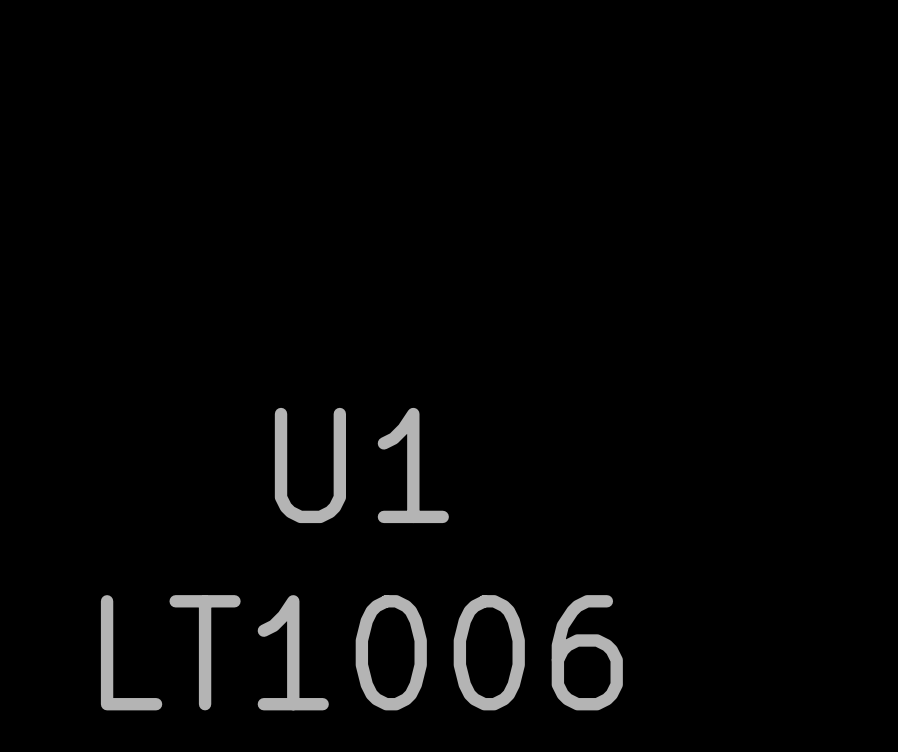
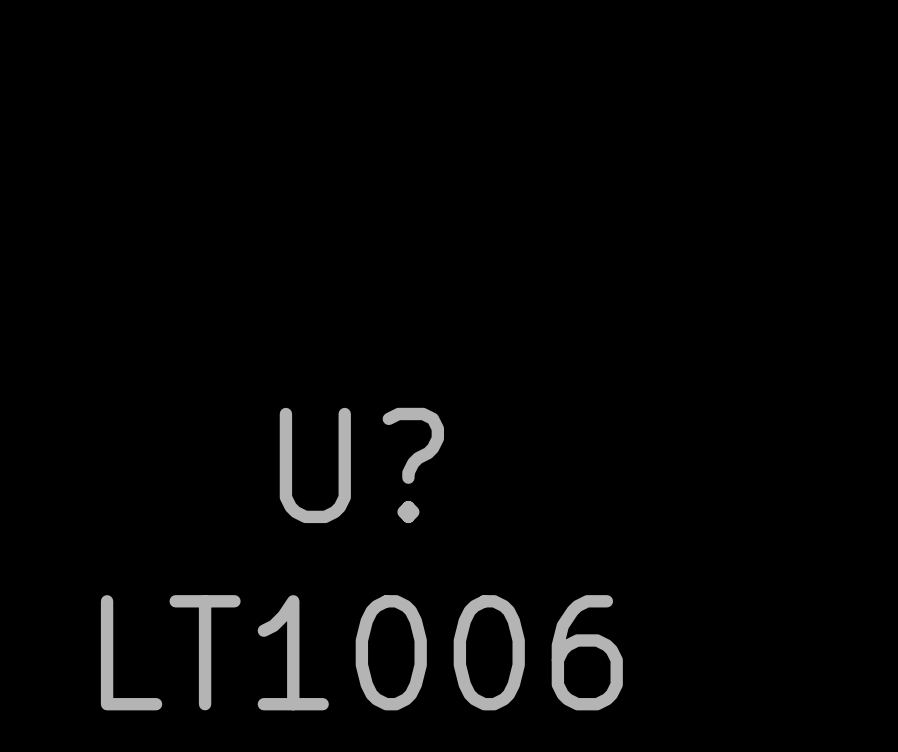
U1 name: U1 (361, 465) -> U? (361, 465)

